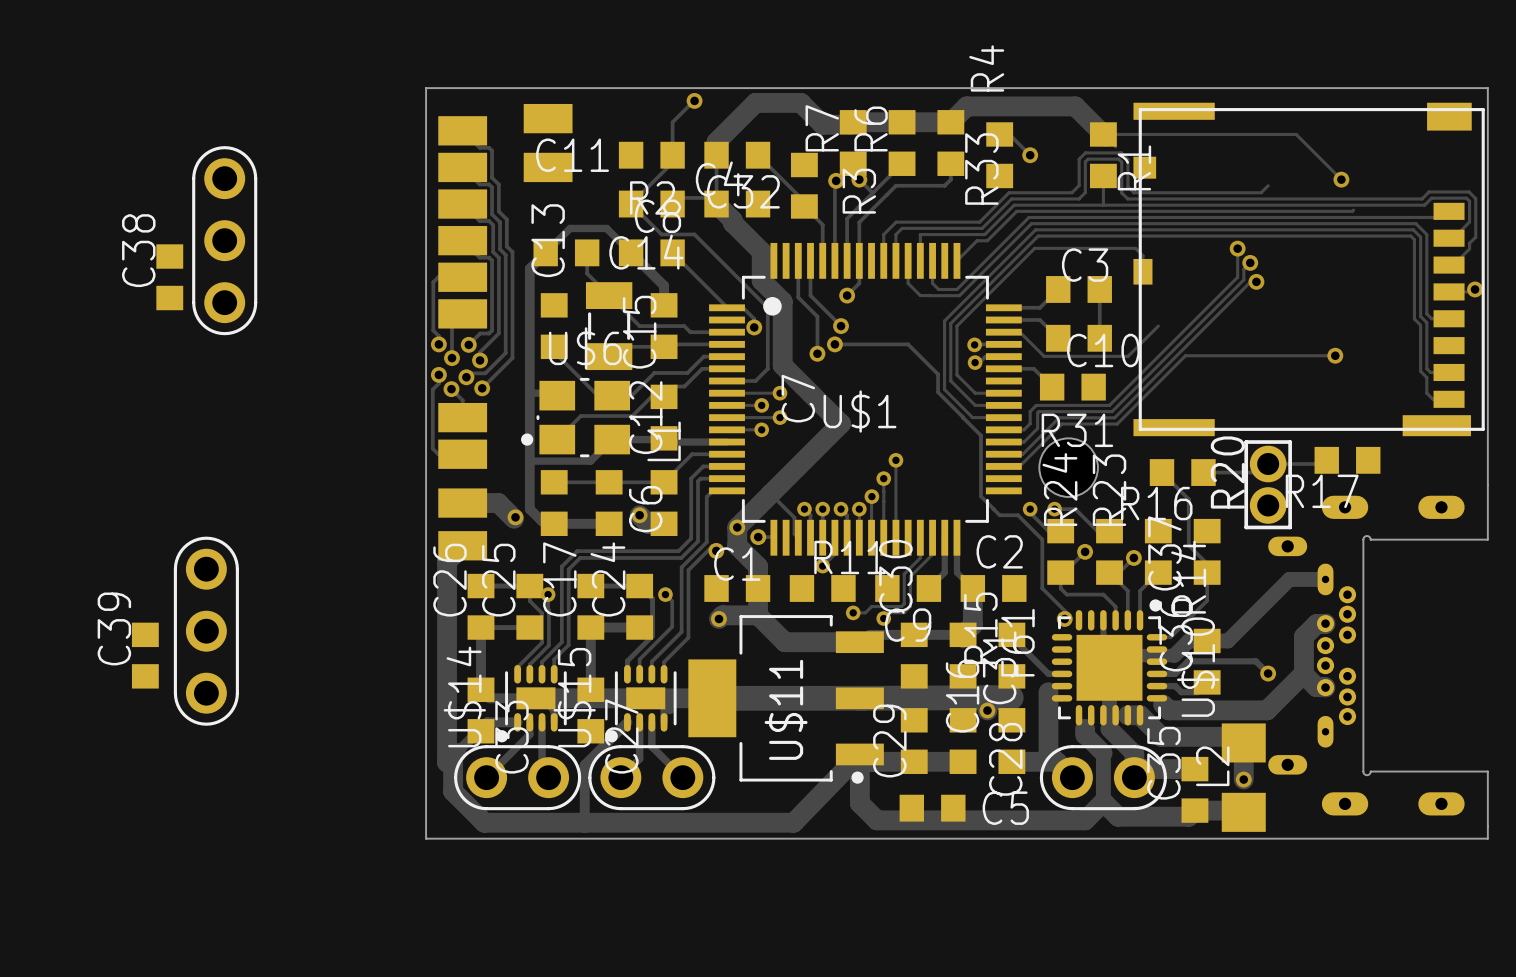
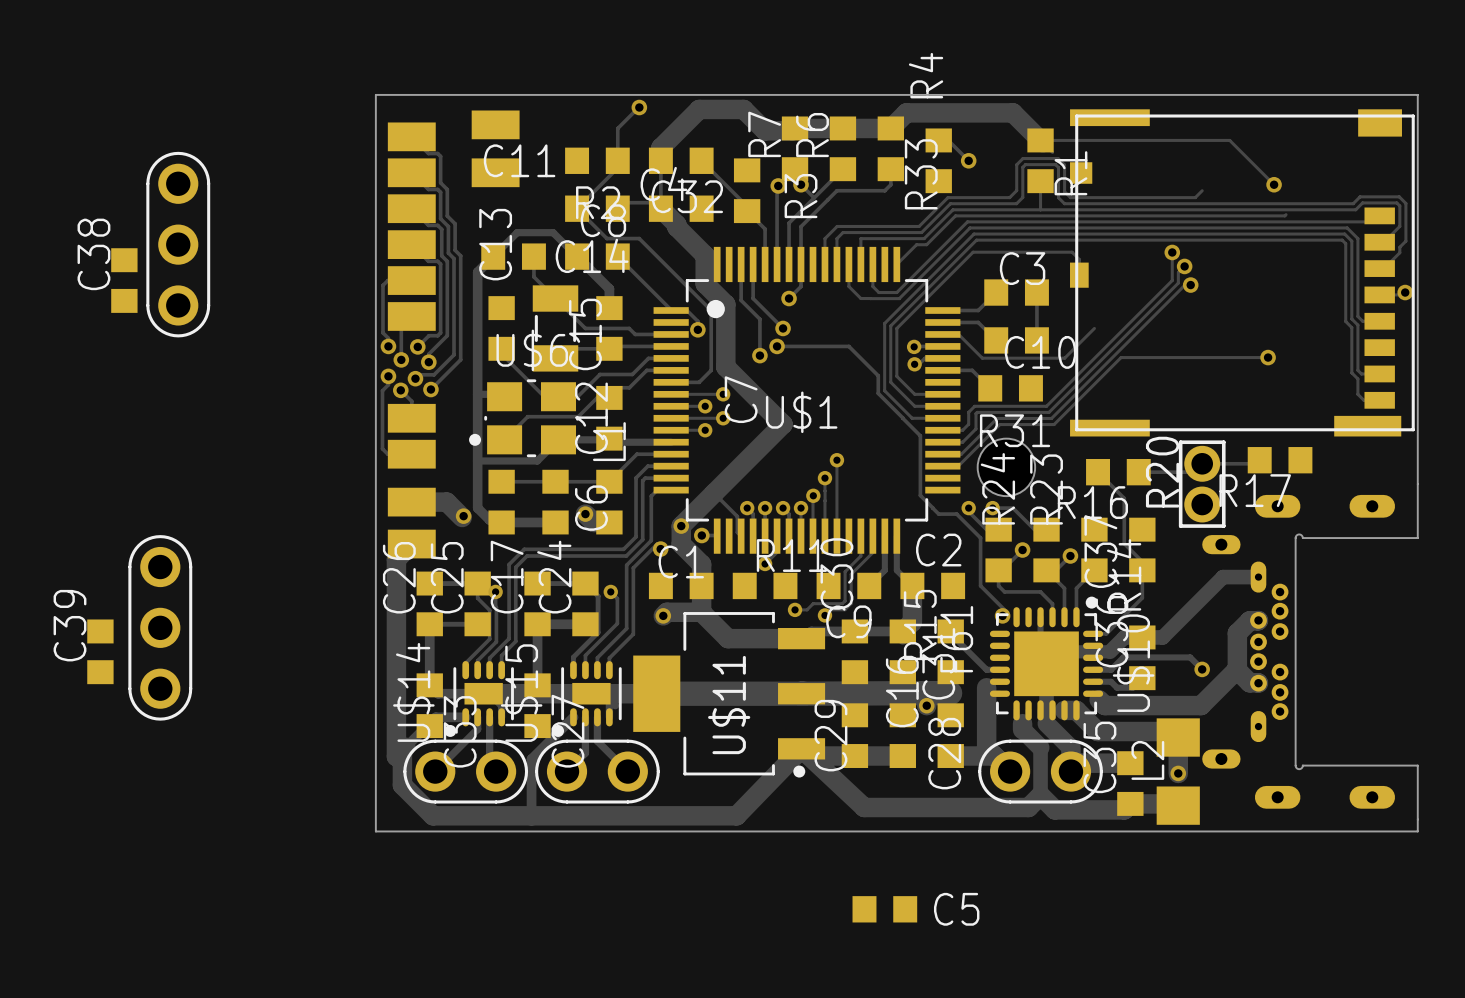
track: (859, 754) (859, 803) (876, 820) (1085, 820) (1091, 814) -> (801, 748) (864, 807) (1028, 807)
C5 position: (932, 808) -> (884, 909)

